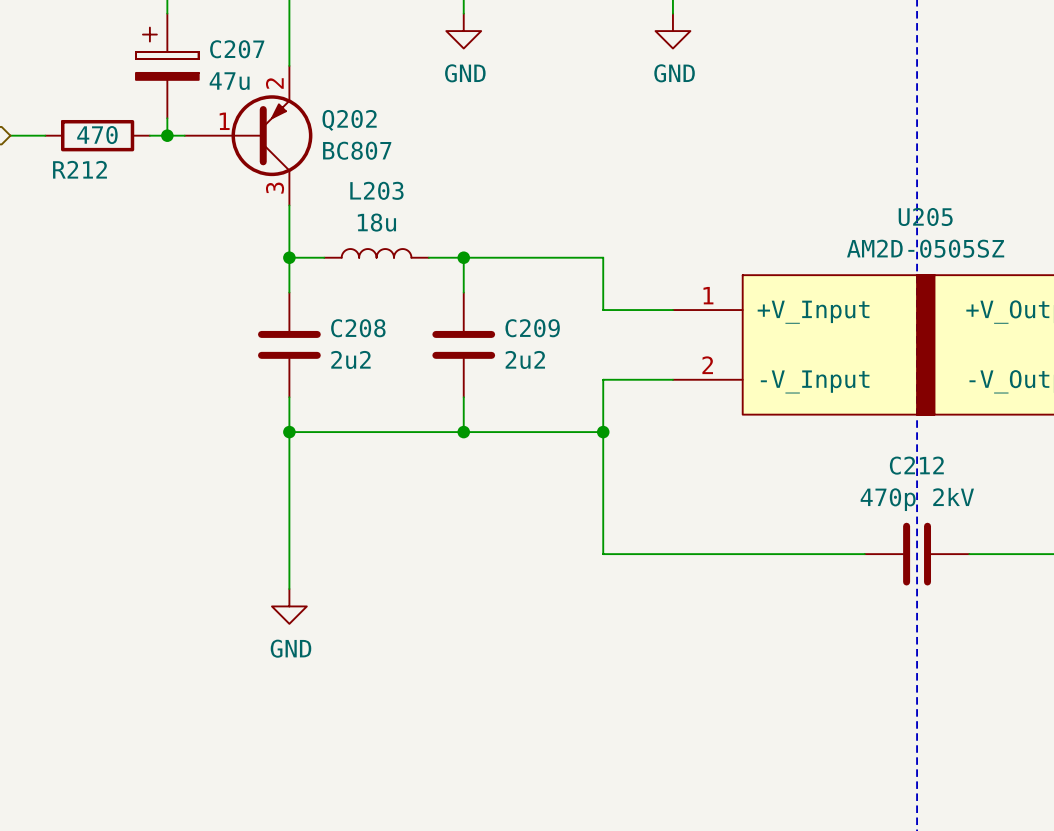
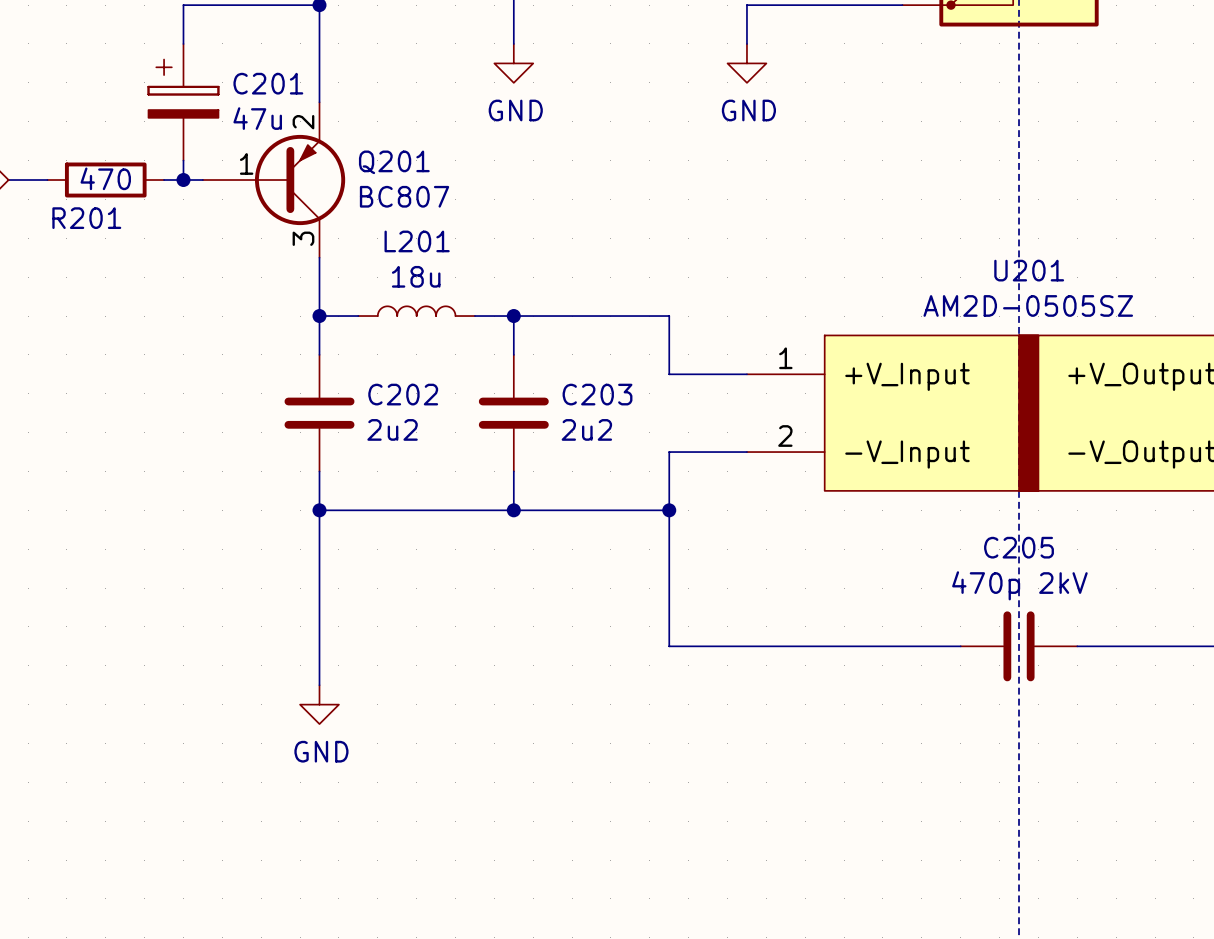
C207 name: C207 (237, 49) -> C201 (268, 83)
Q202 name: Q202 (349, 120) -> Q201 (394, 162)
R212 name: R212 (79, 169) -> R201 (86, 218)
L203 name: L203 (376, 190) -> L201 (417, 241)
U205 name: U205 (925, 216) -> U201 (1029, 270)
C208 name: C208 (358, 328) -> C202 (403, 394)
C209 name: C209 (532, 328) -> C203 (597, 394)
C212 name: C212 (916, 465) -> C205 (1019, 547)

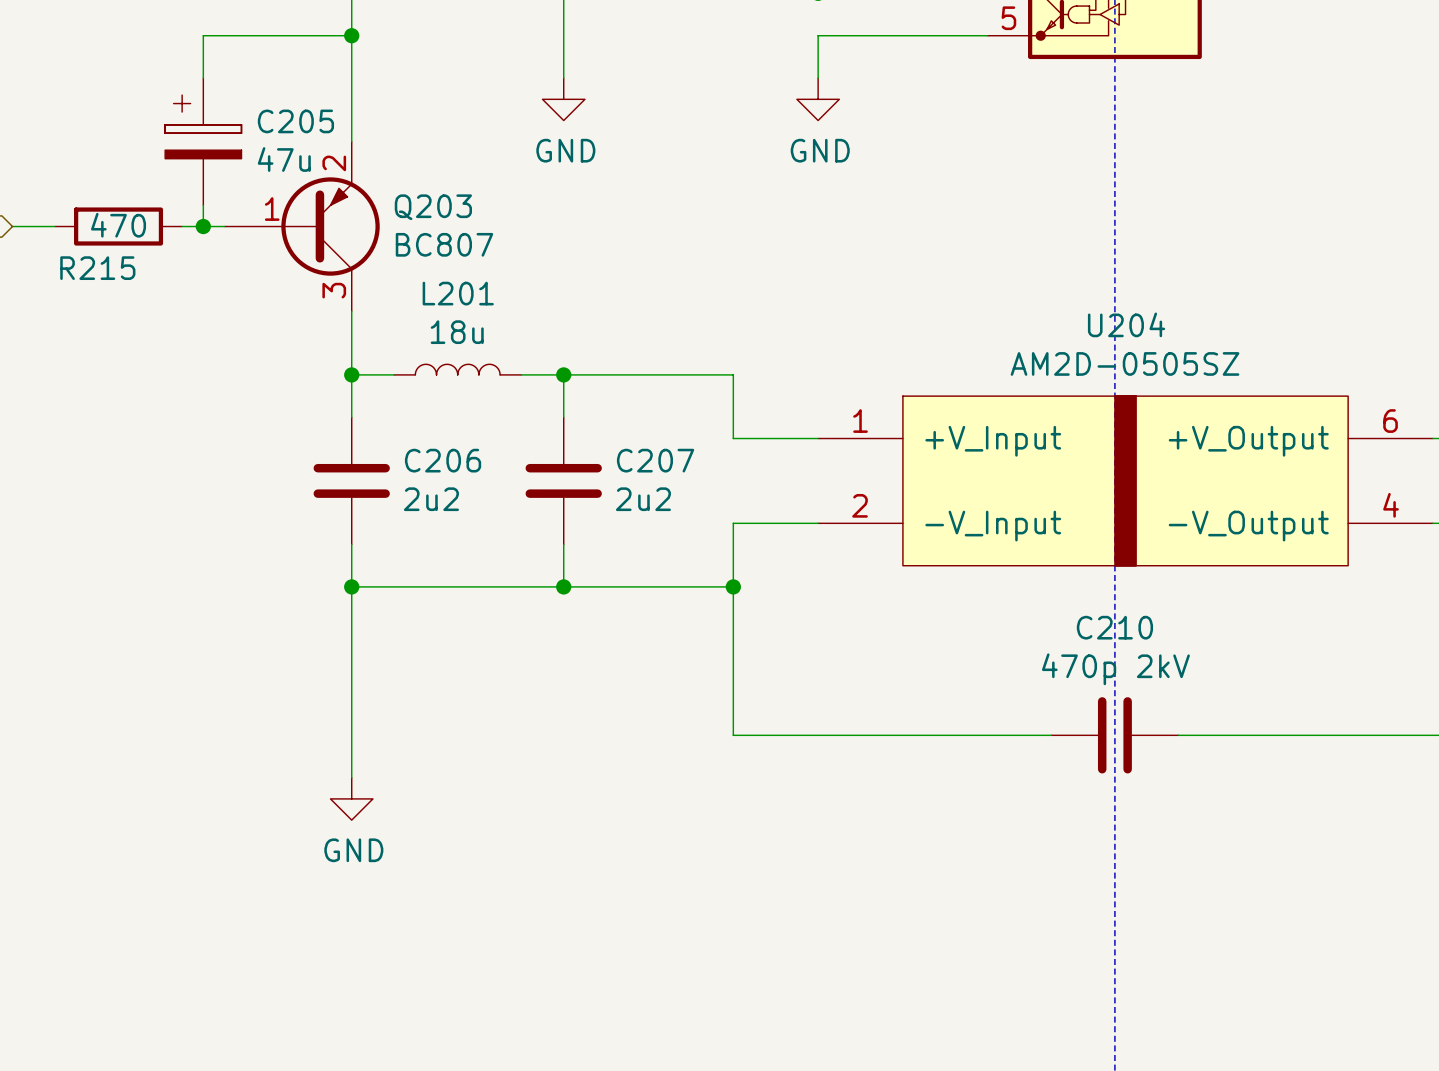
C201 name: C201 (268, 83) -> C205 (295, 121)
Q201 name: Q201 (394, 162) -> Q203 (433, 207)
R201 name: R201 (86, 218) -> R215 (97, 268)
U201 name: U201 (1029, 270) -> U204 (1126, 324)
C202 name: C202 (403, 394) -> C206 (443, 460)
C203 name: C203 (597, 394) -> C207 (655, 460)
C205 name: C205 (1019, 547) -> C210 (1114, 627)

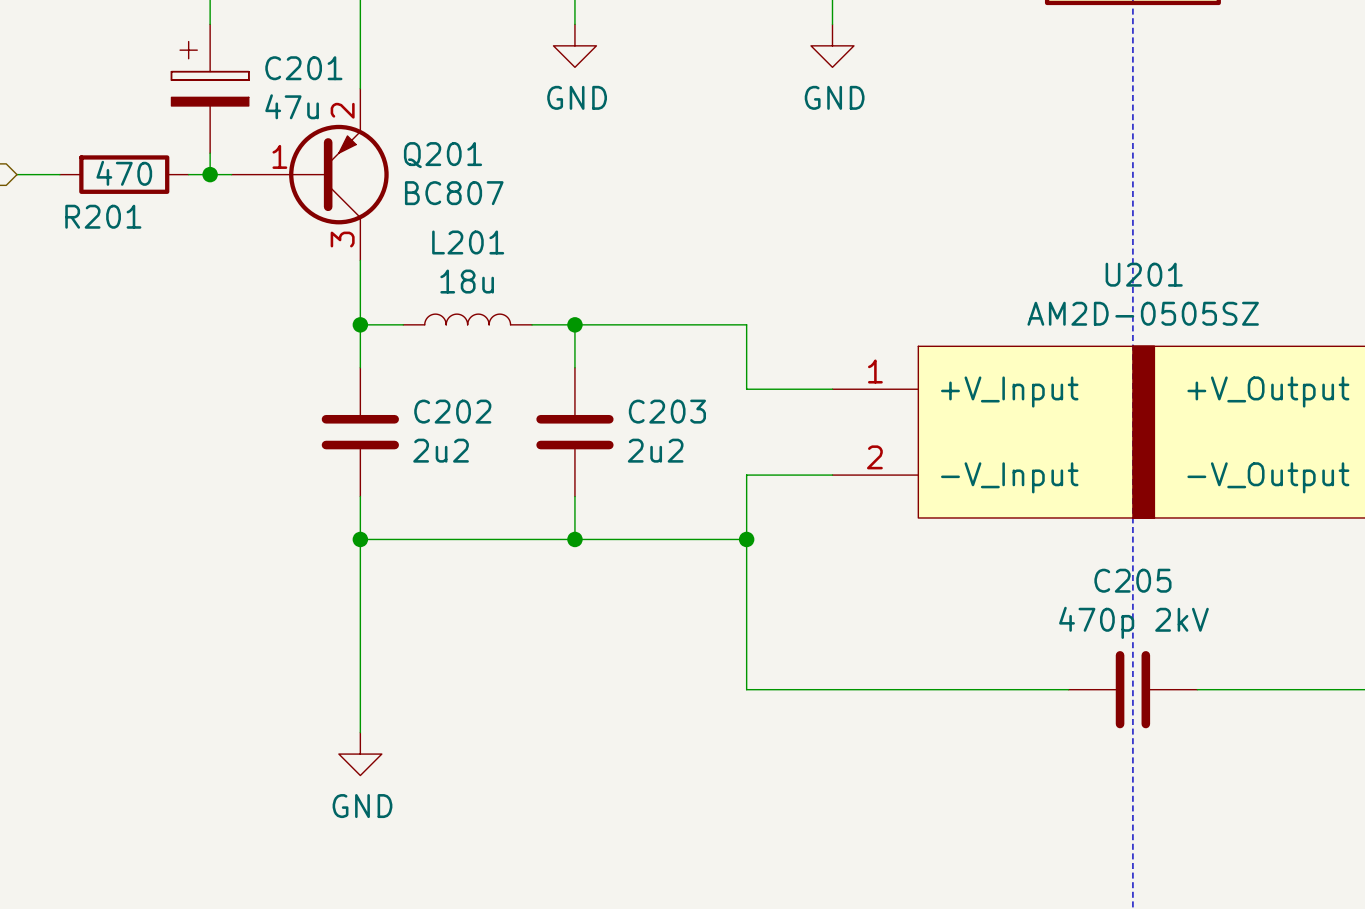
C205 name: C205 (295, 121) -> C201 (303, 68)
Q203 name: Q203 (433, 207) -> Q201 (443, 155)
R215 name: R215 (97, 268) -> R201 (103, 216)
U204 name: U204 (1126, 324) -> U201 (1144, 274)
C206 name: C206 (443, 460) -> C202 (452, 411)
C207 name: C207 (655, 460) -> C203 (667, 411)
C210 name: C210 (1114, 627) -> C205 (1132, 580)

